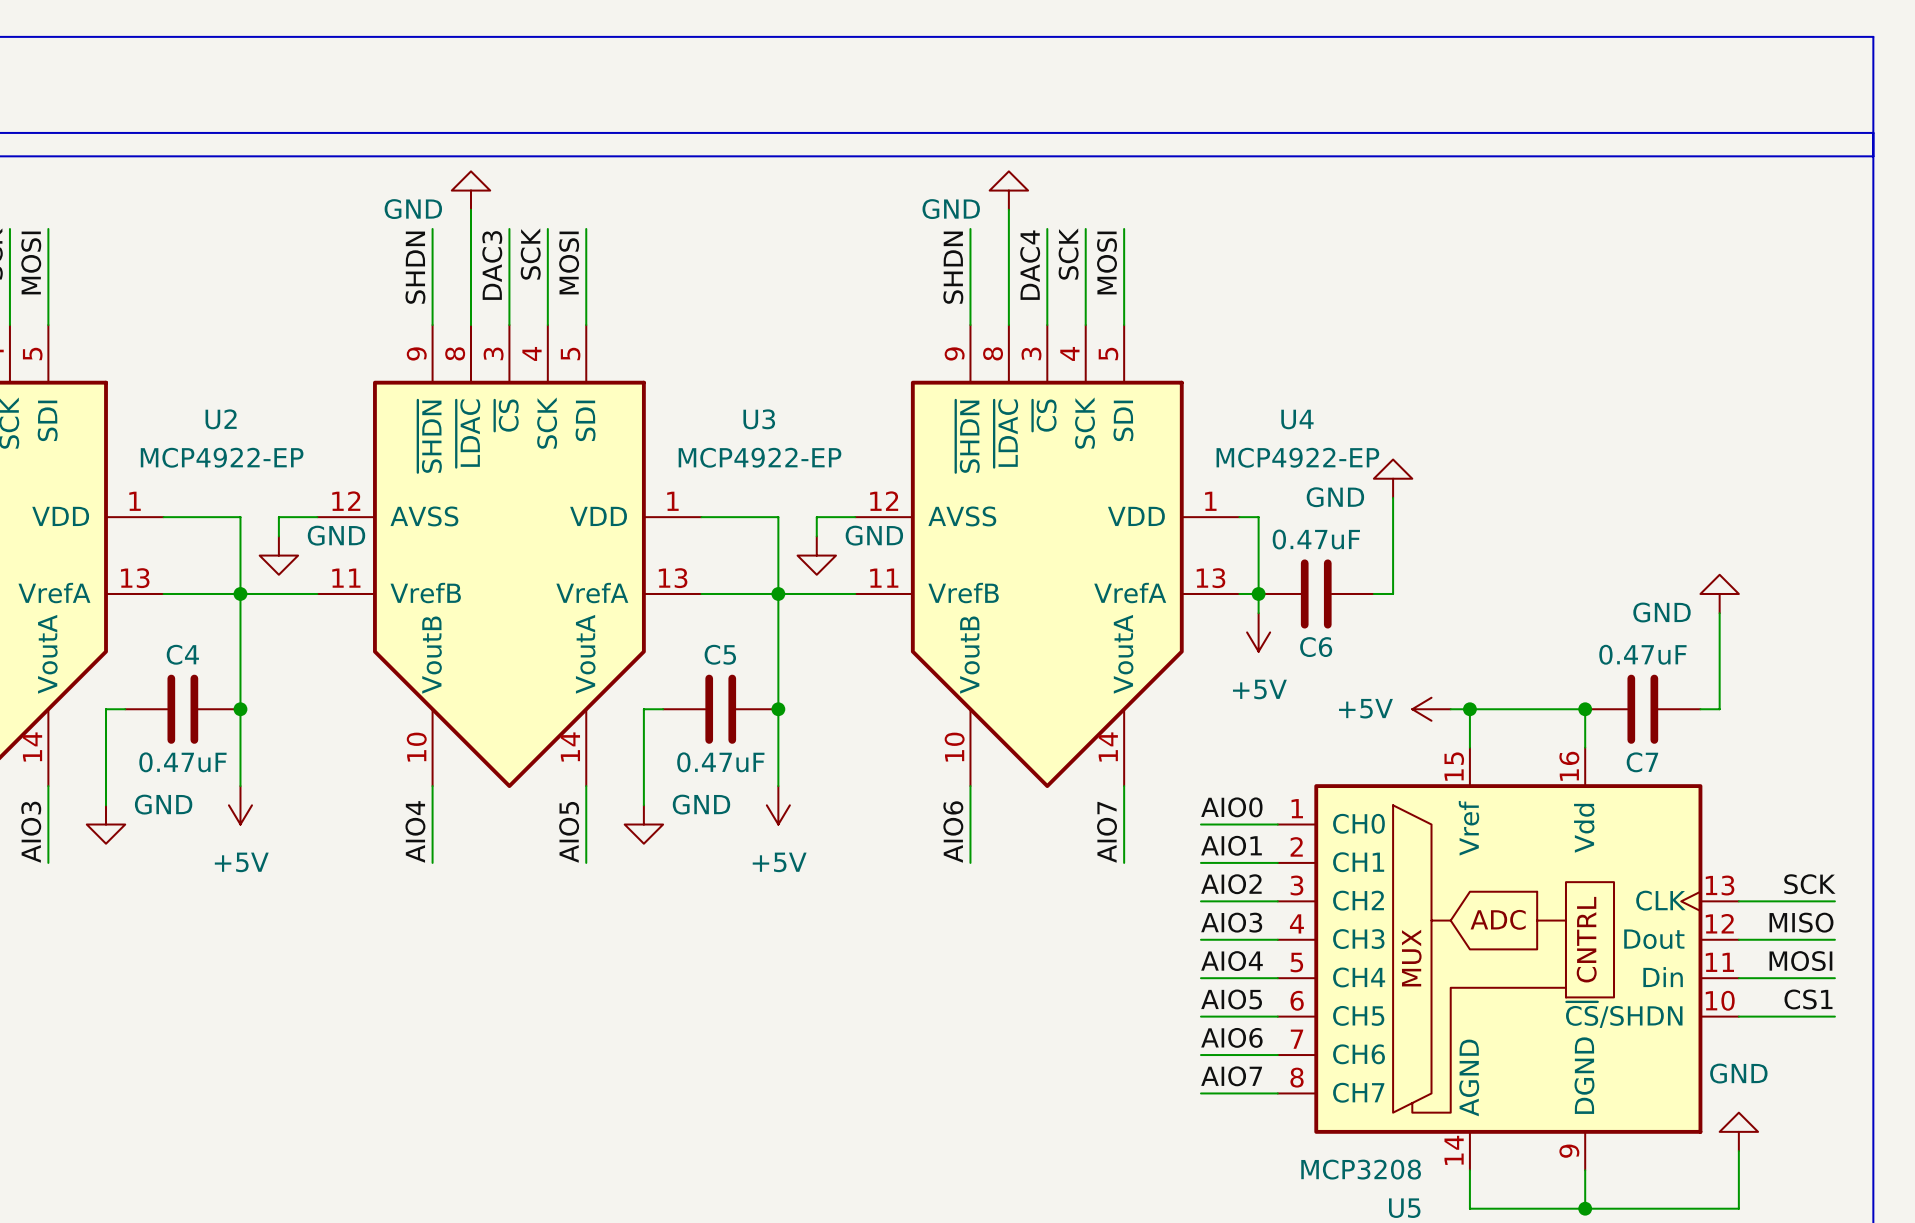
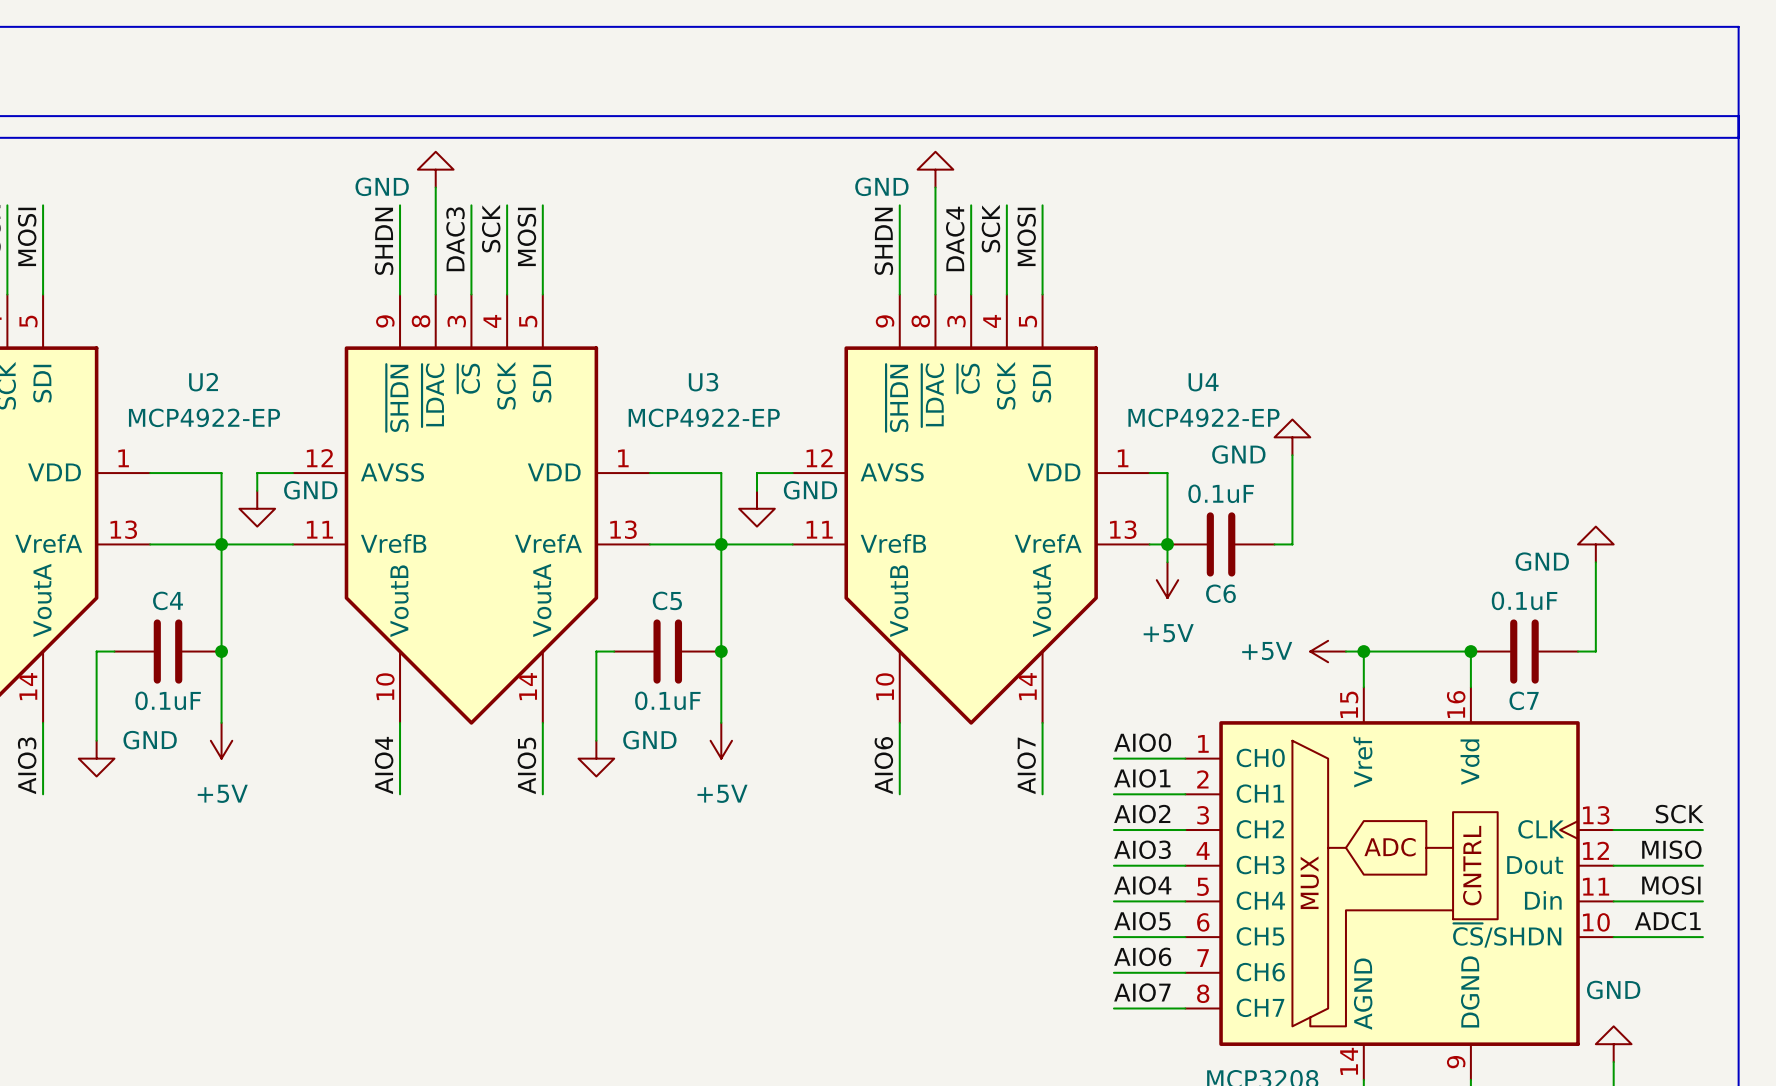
C6 value: 0.47uF (1316, 539) -> 0.1uF (1221, 493)
C7 value: 0.47uF (1642, 654) -> 0.1uF (1524, 600)
C4 value: 0.47uF (182, 762) -> 0.1uF (168, 700)
C5 value: 0.47uF (720, 762) -> 0.1uF (667, 700)
label: CS1 (1808, 999) -> ADC1 (1667, 921)

